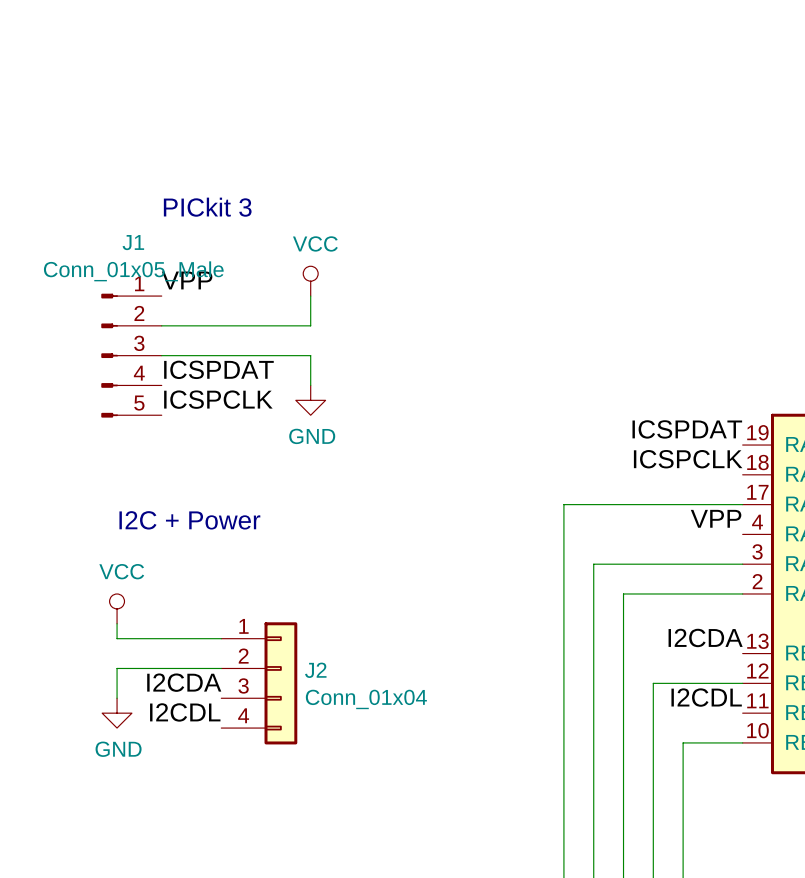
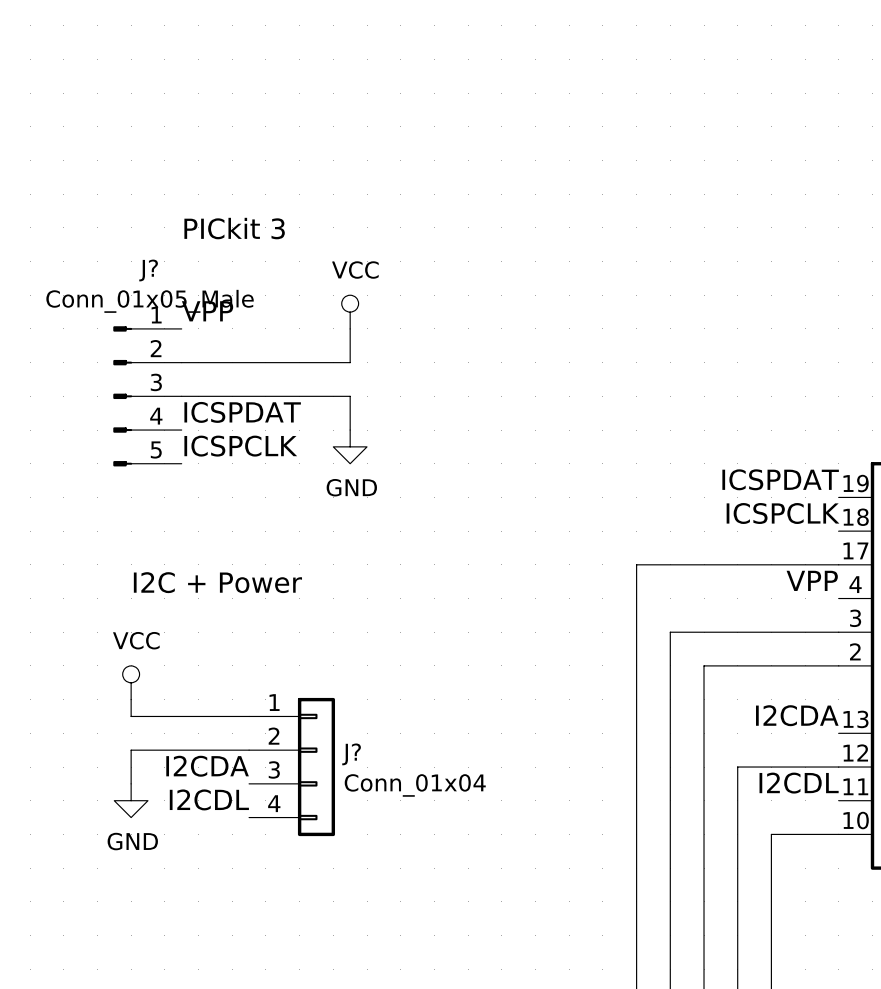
J1 name: J1 (133, 242) -> J? (148, 270)
J2 name: J2 (315, 670) -> J? (351, 754)

